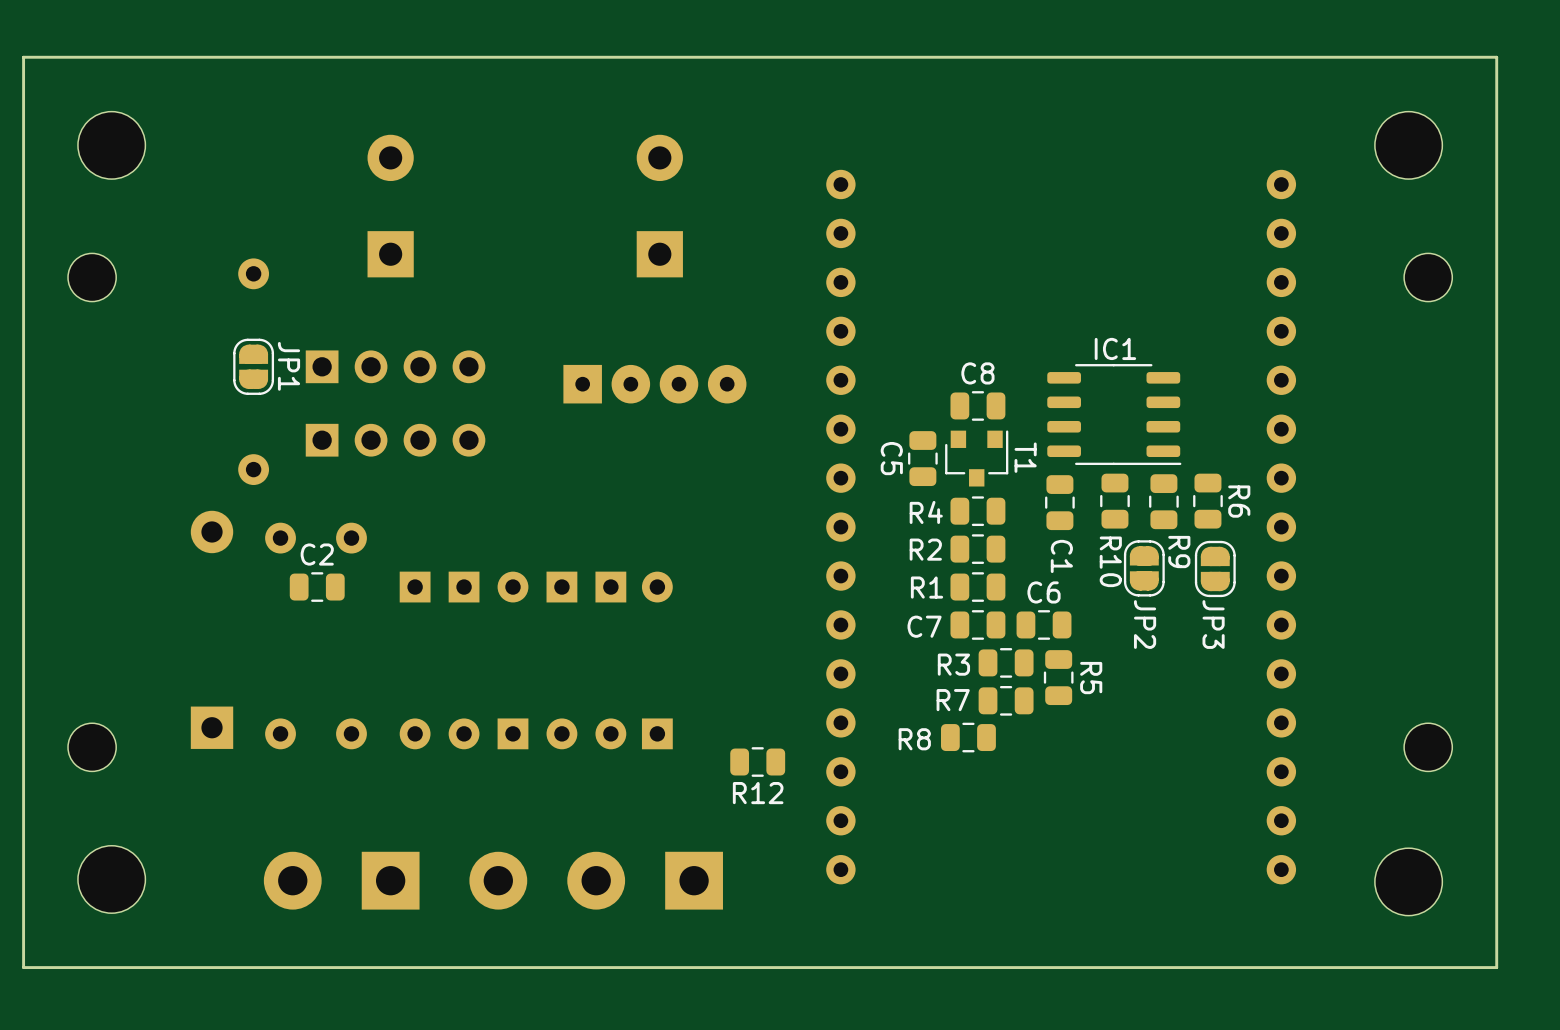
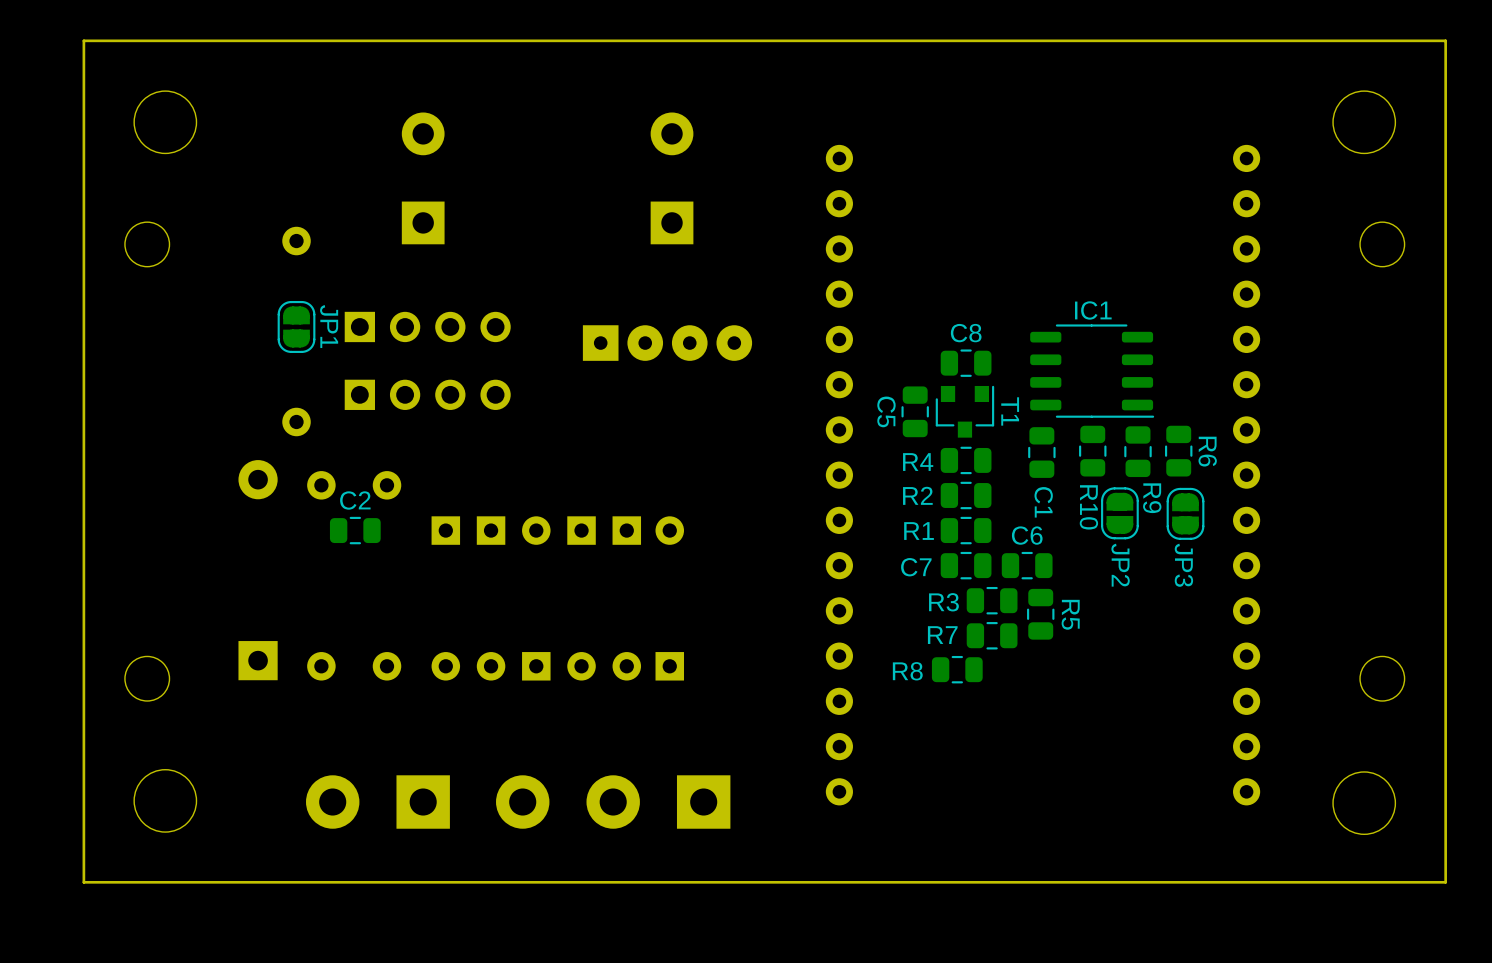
R12: (757, 762) -> none

